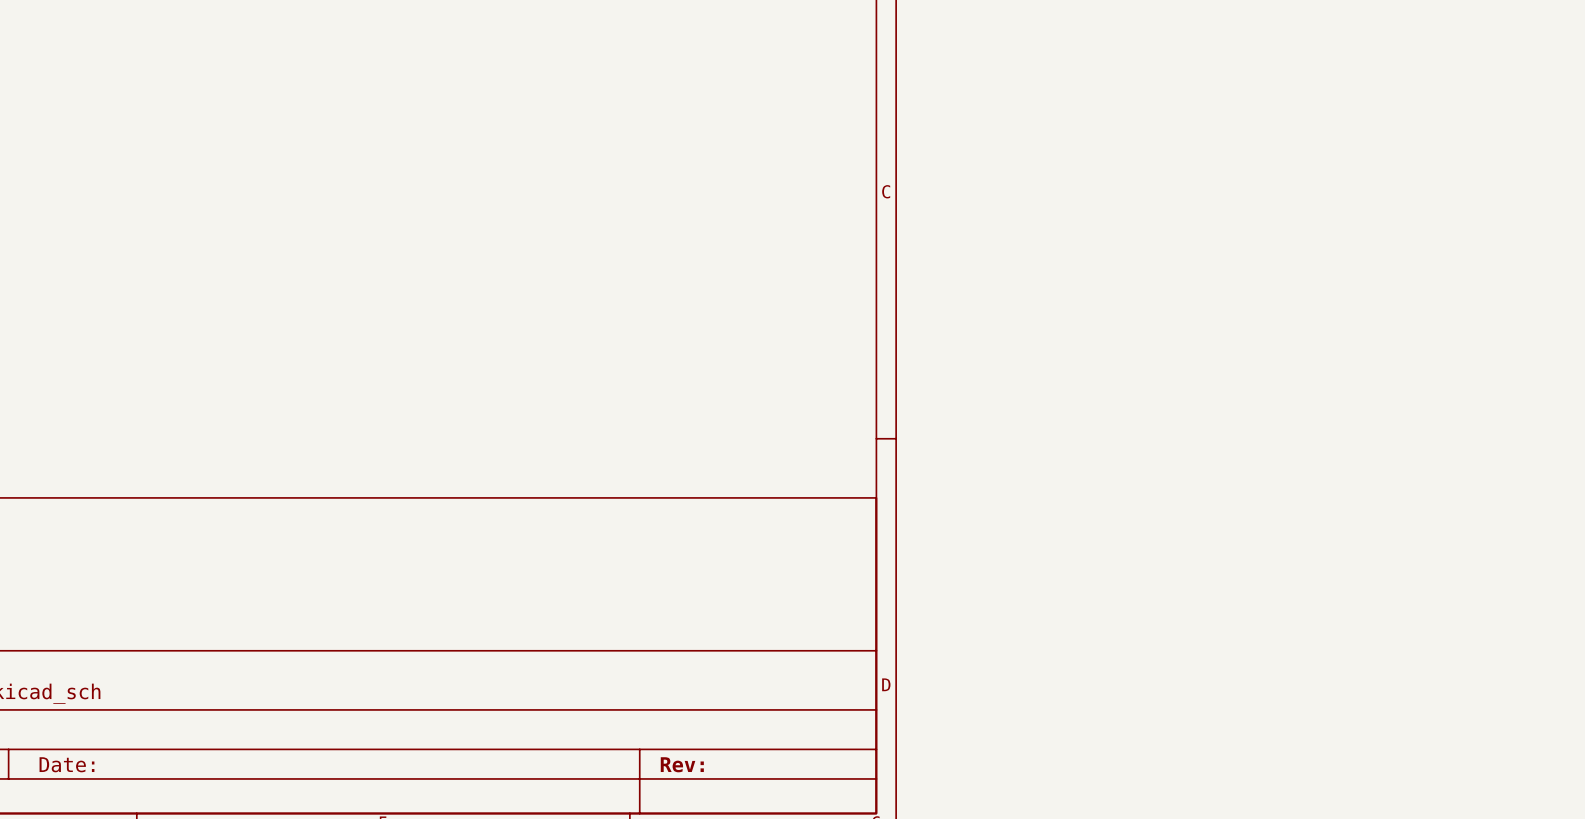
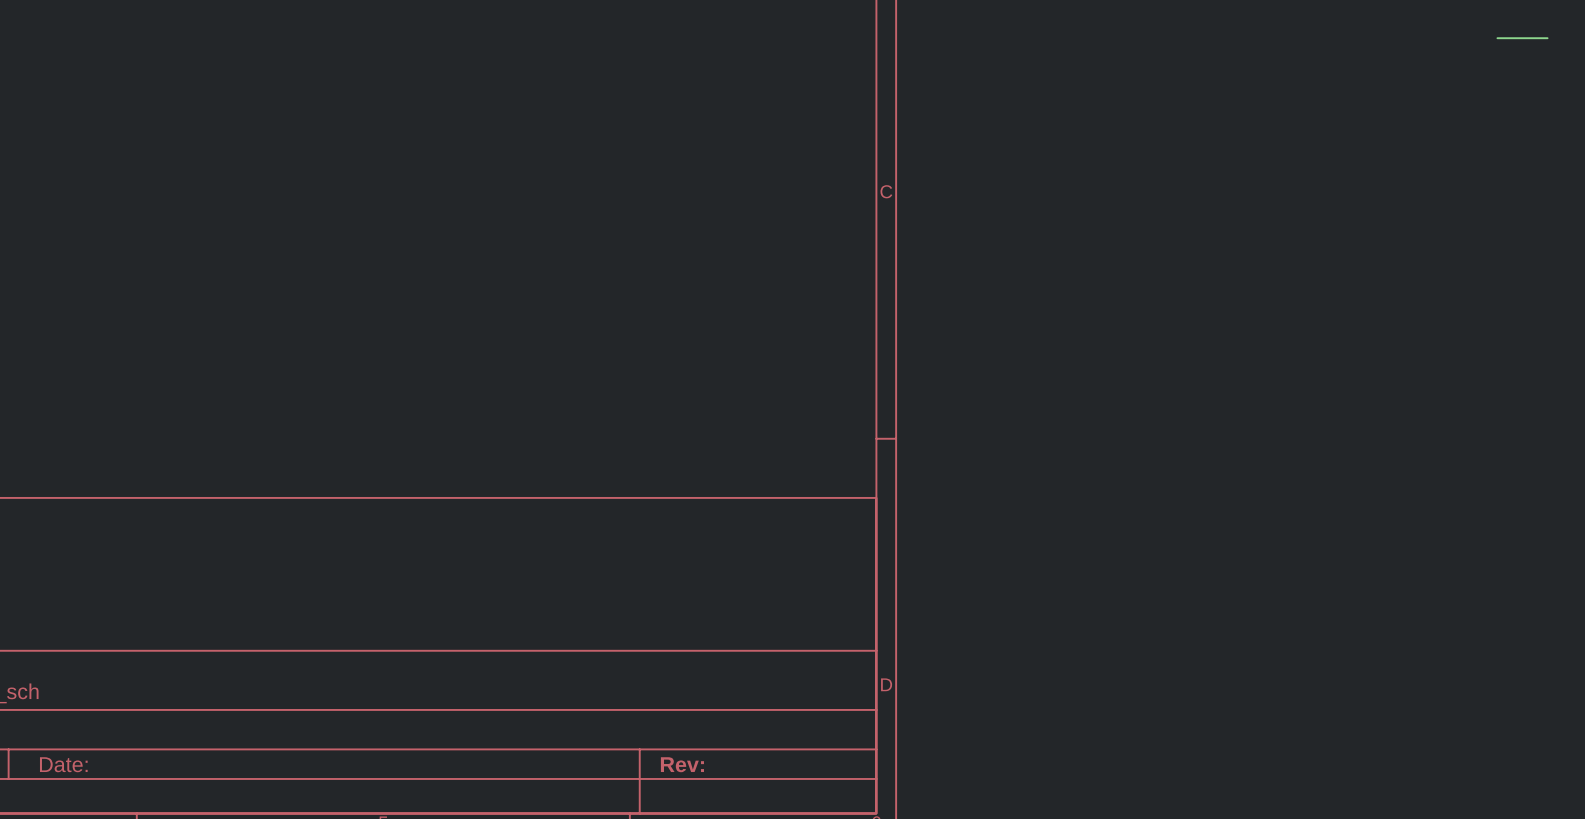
wire: none -> (1497, 38) (1547, 38)

